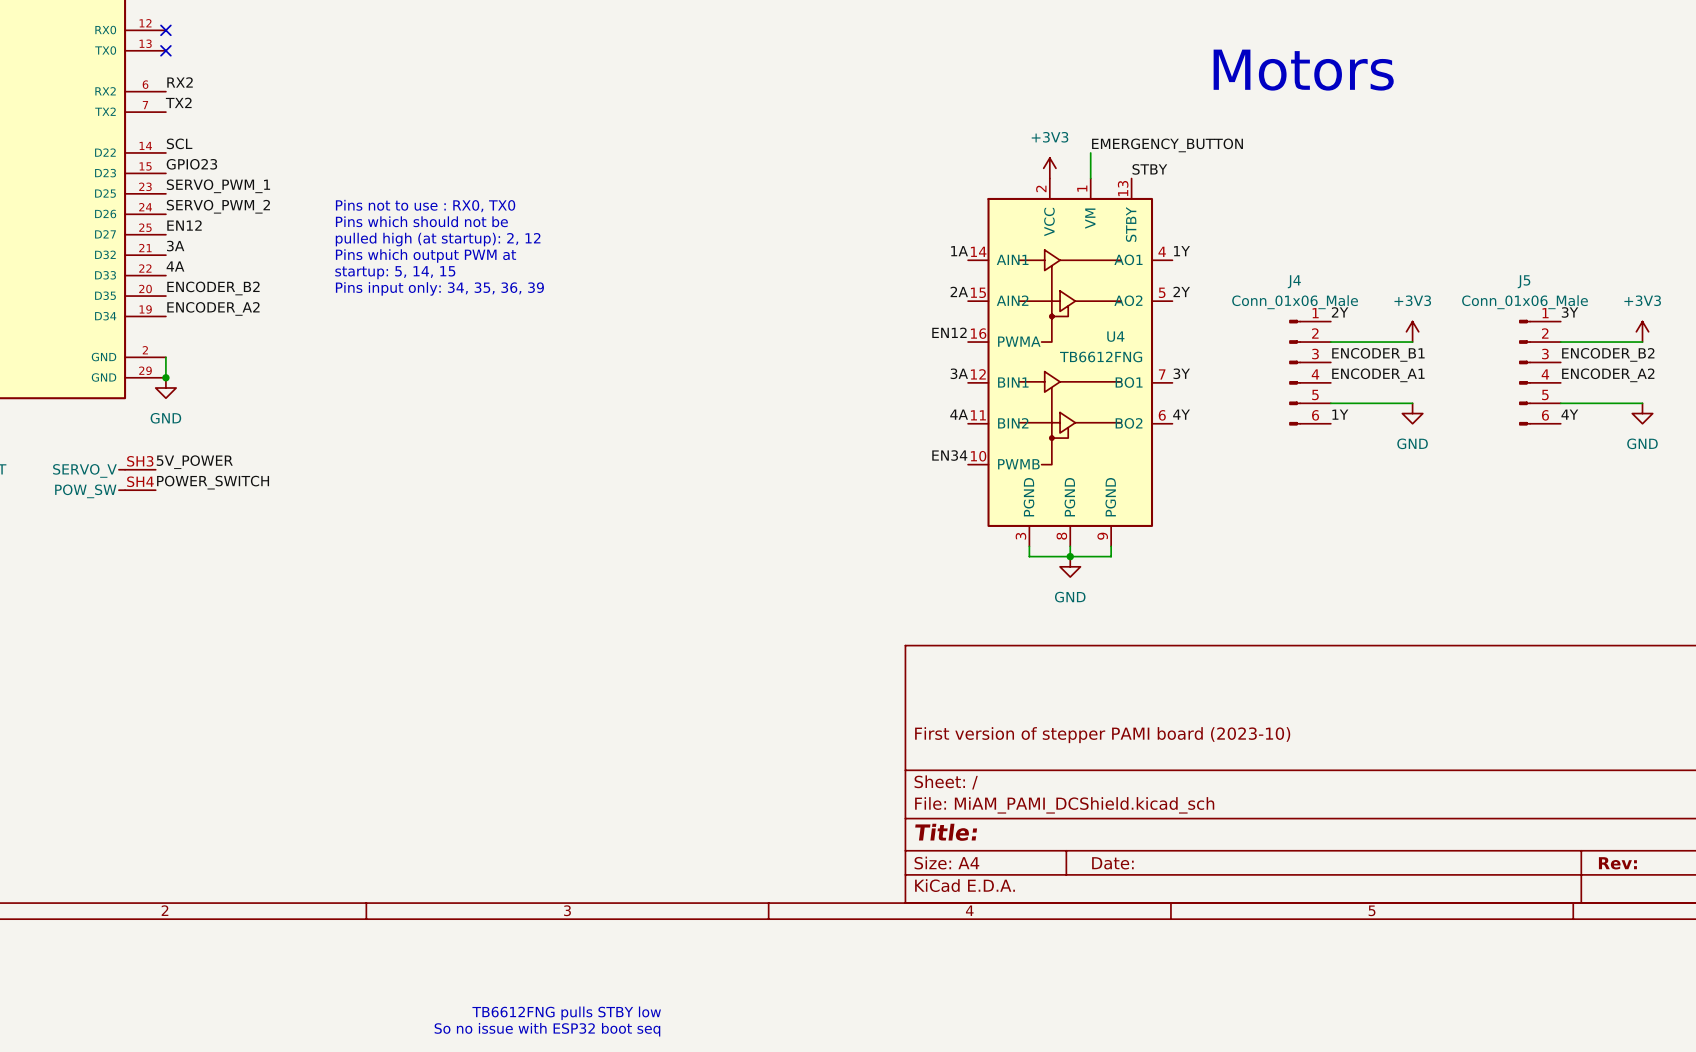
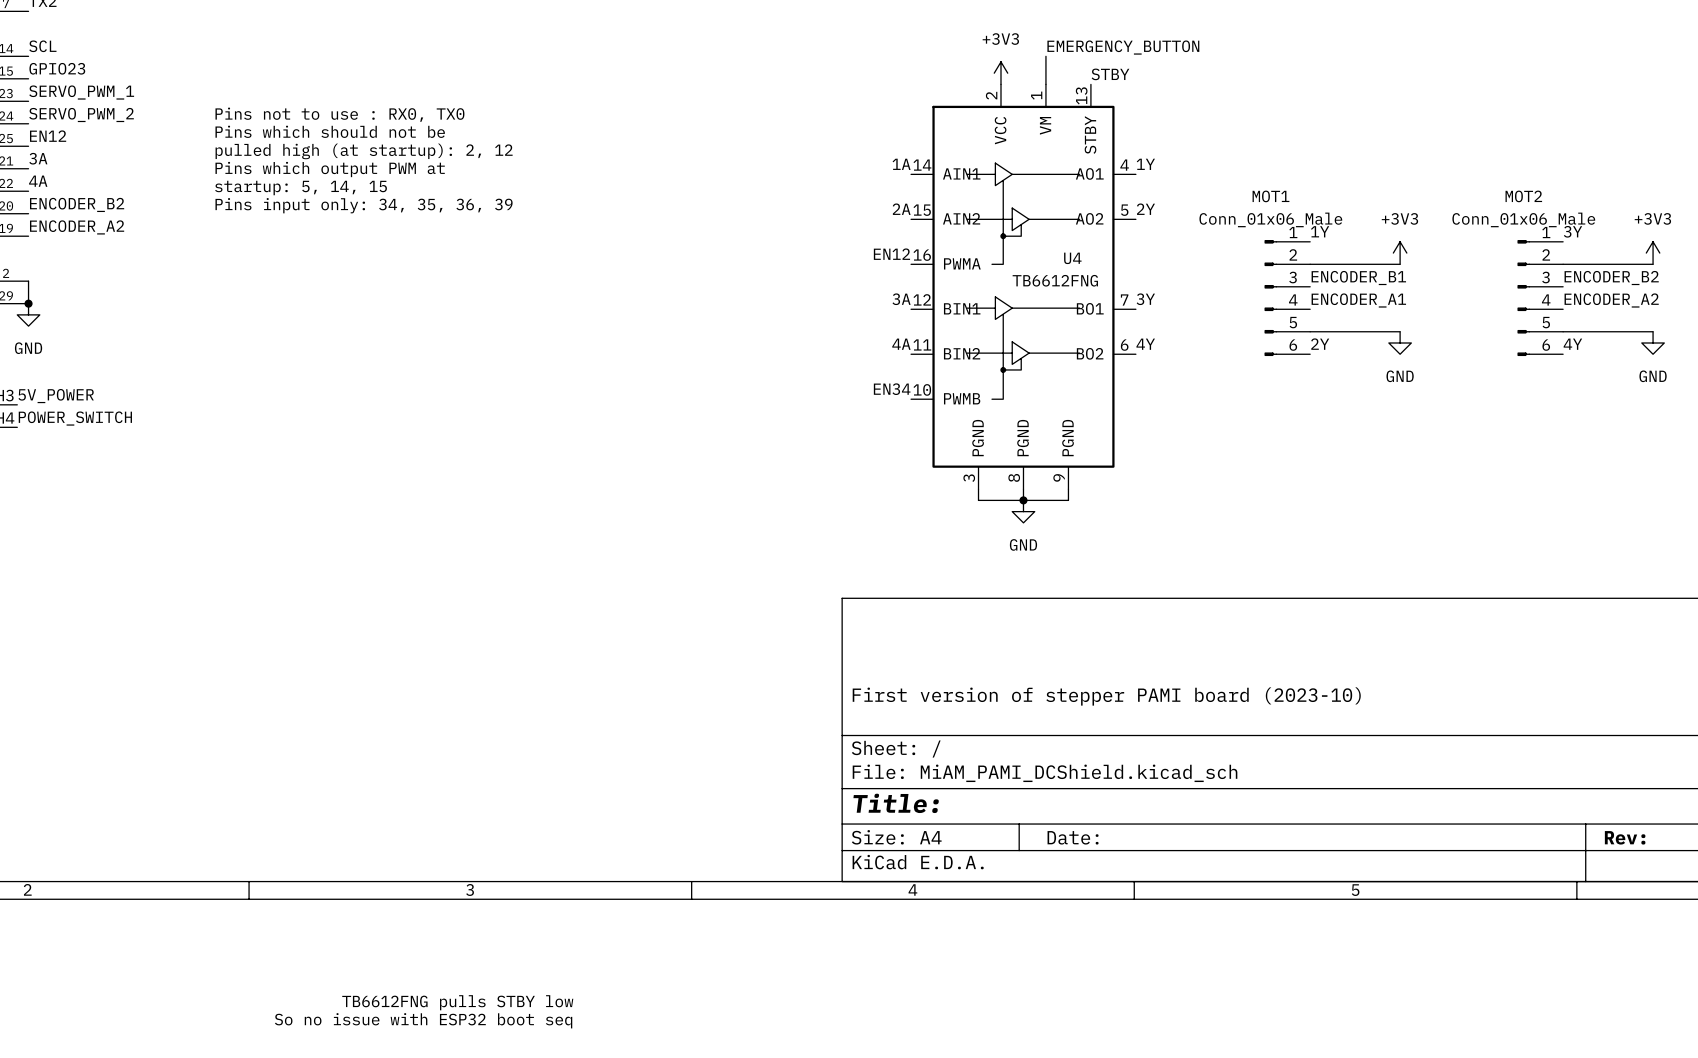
J4 name: J4 (1294, 281) -> MOT1 (1270, 196)
J5 name: J5 (1524, 281) -> MOT2 (1523, 196)
label: 2Y (1340, 312) -> 1Y (1320, 231)
label: 1Y (1340, 414) -> 2Y (1320, 344)

